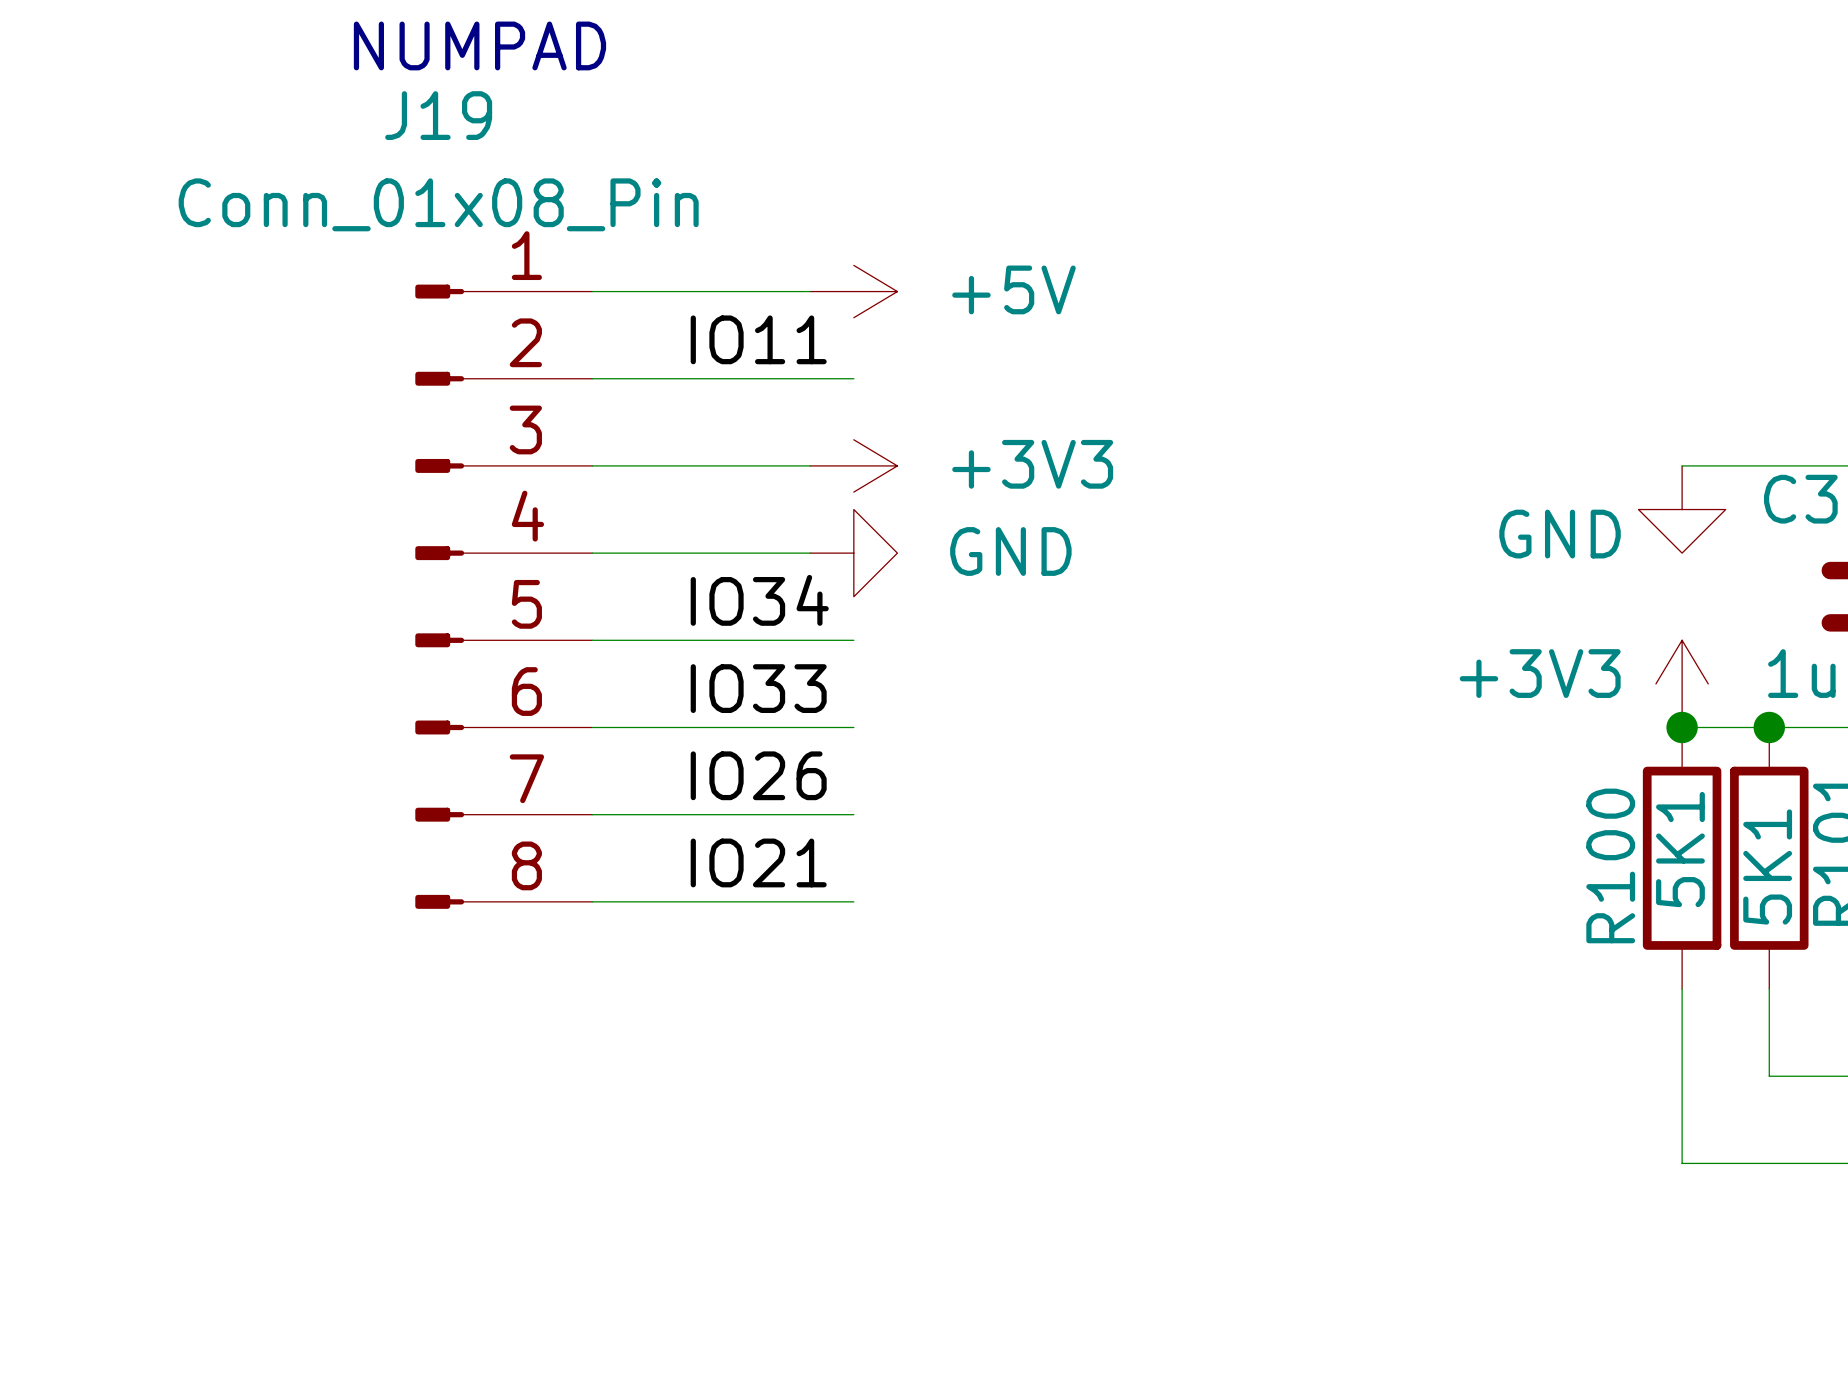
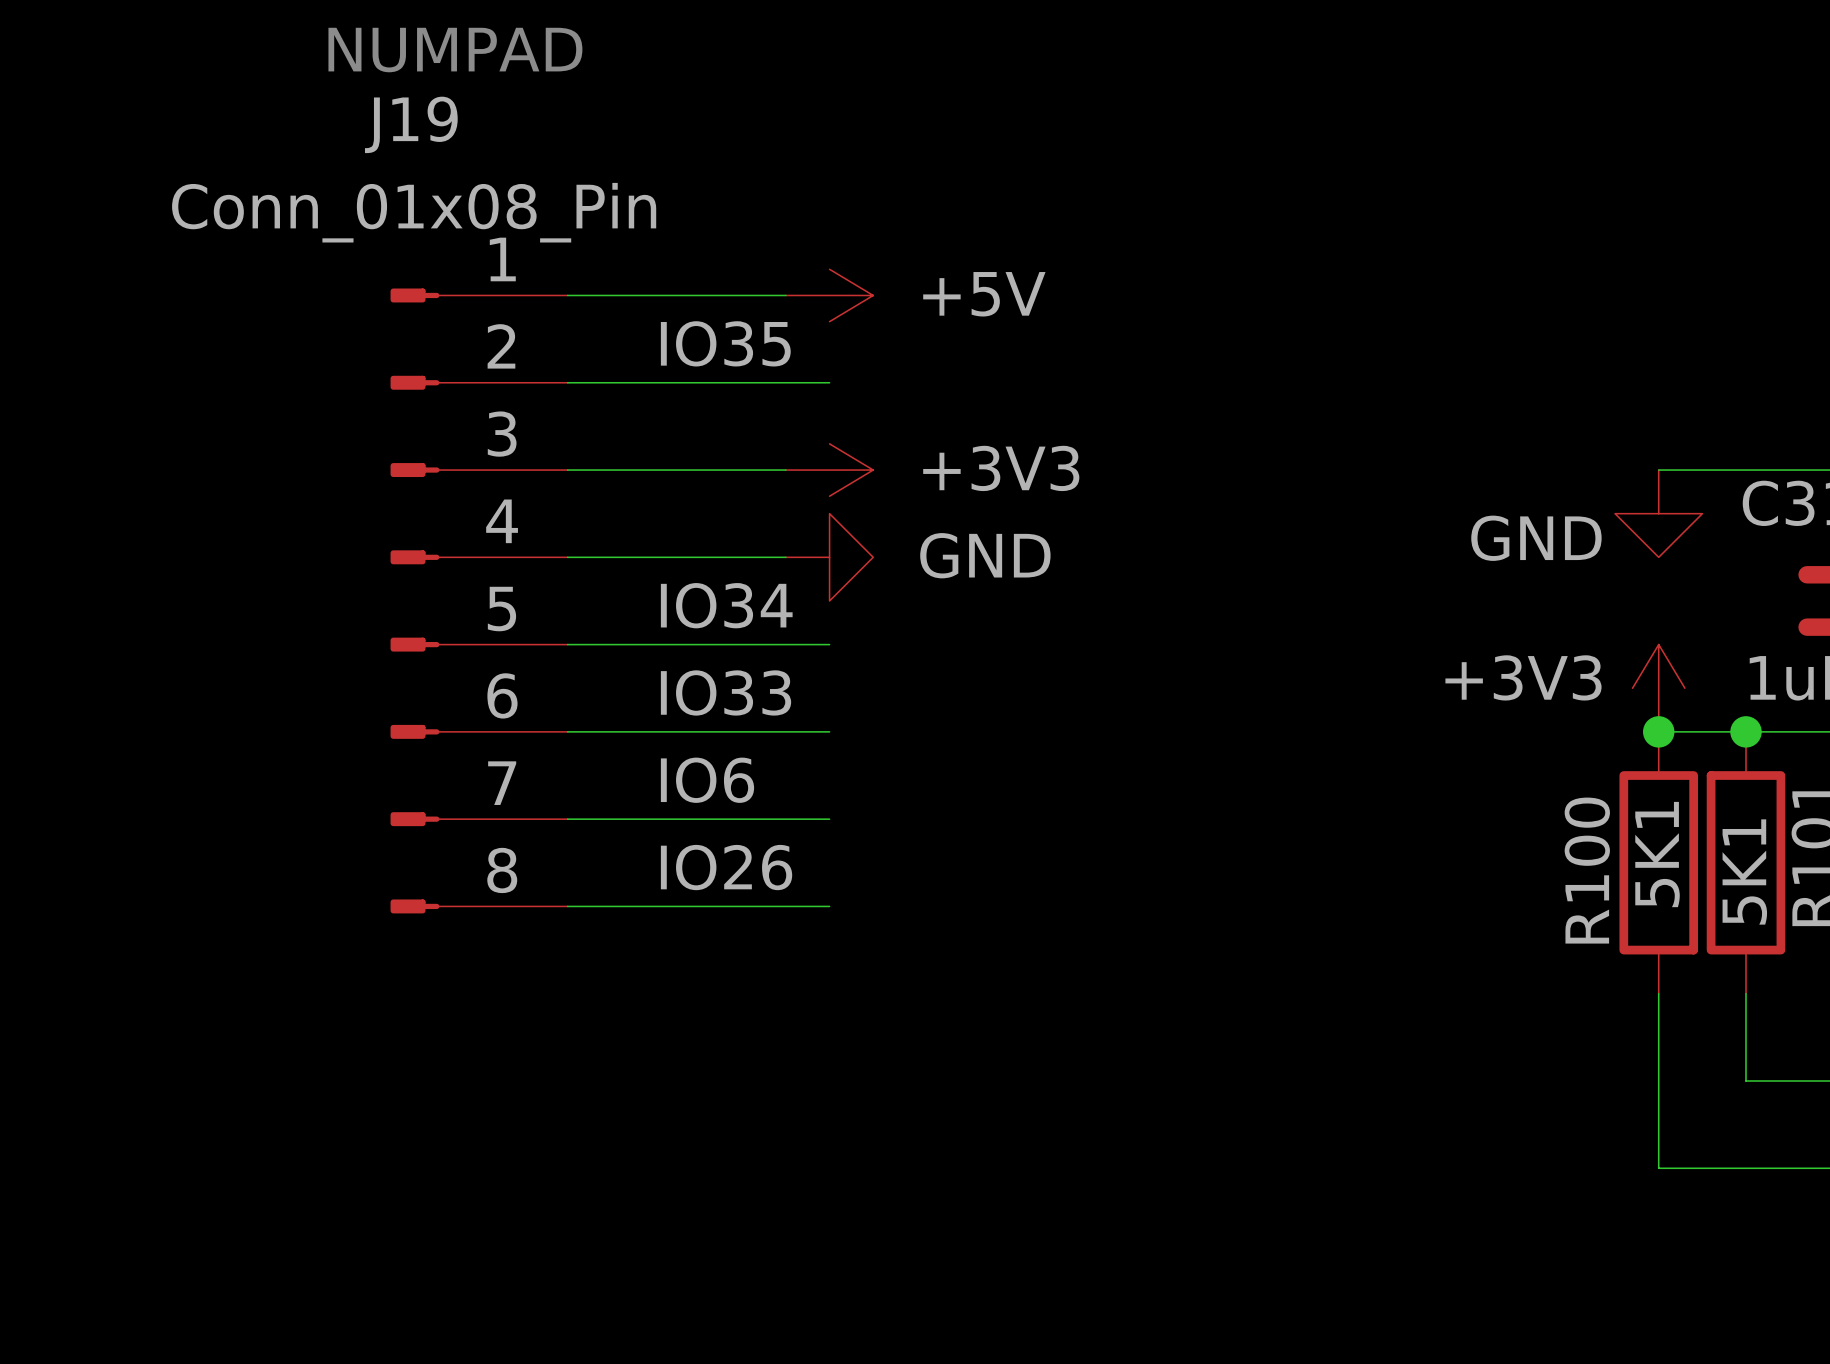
label: IO11 (758, 339) -> IO35 (725, 343)
label: IO26 (758, 775) -> IO6 (707, 780)
label: IO21 (758, 862) -> IO26 (726, 867)

